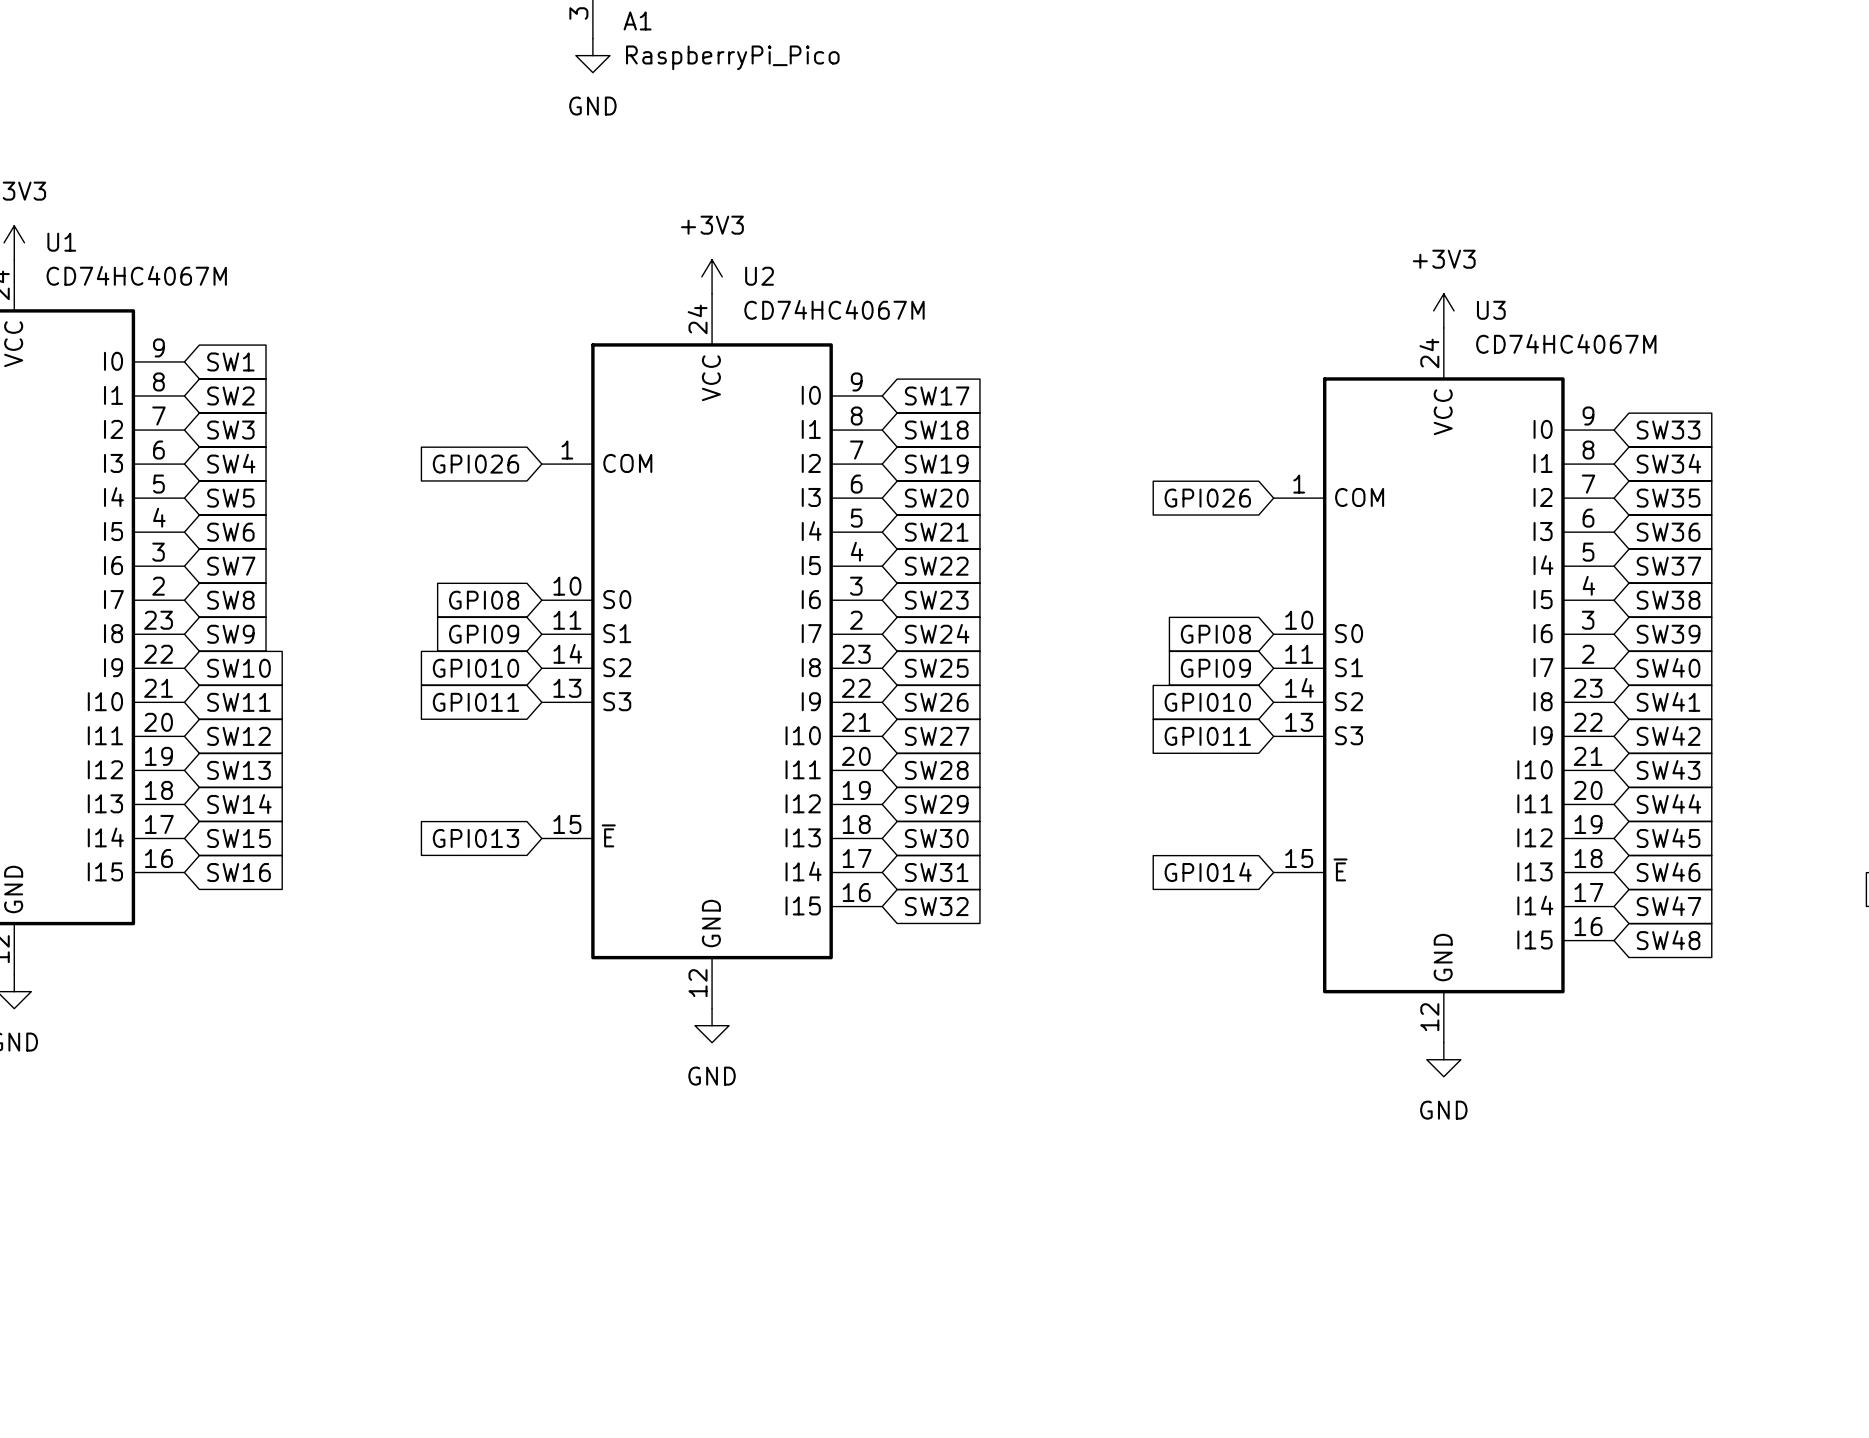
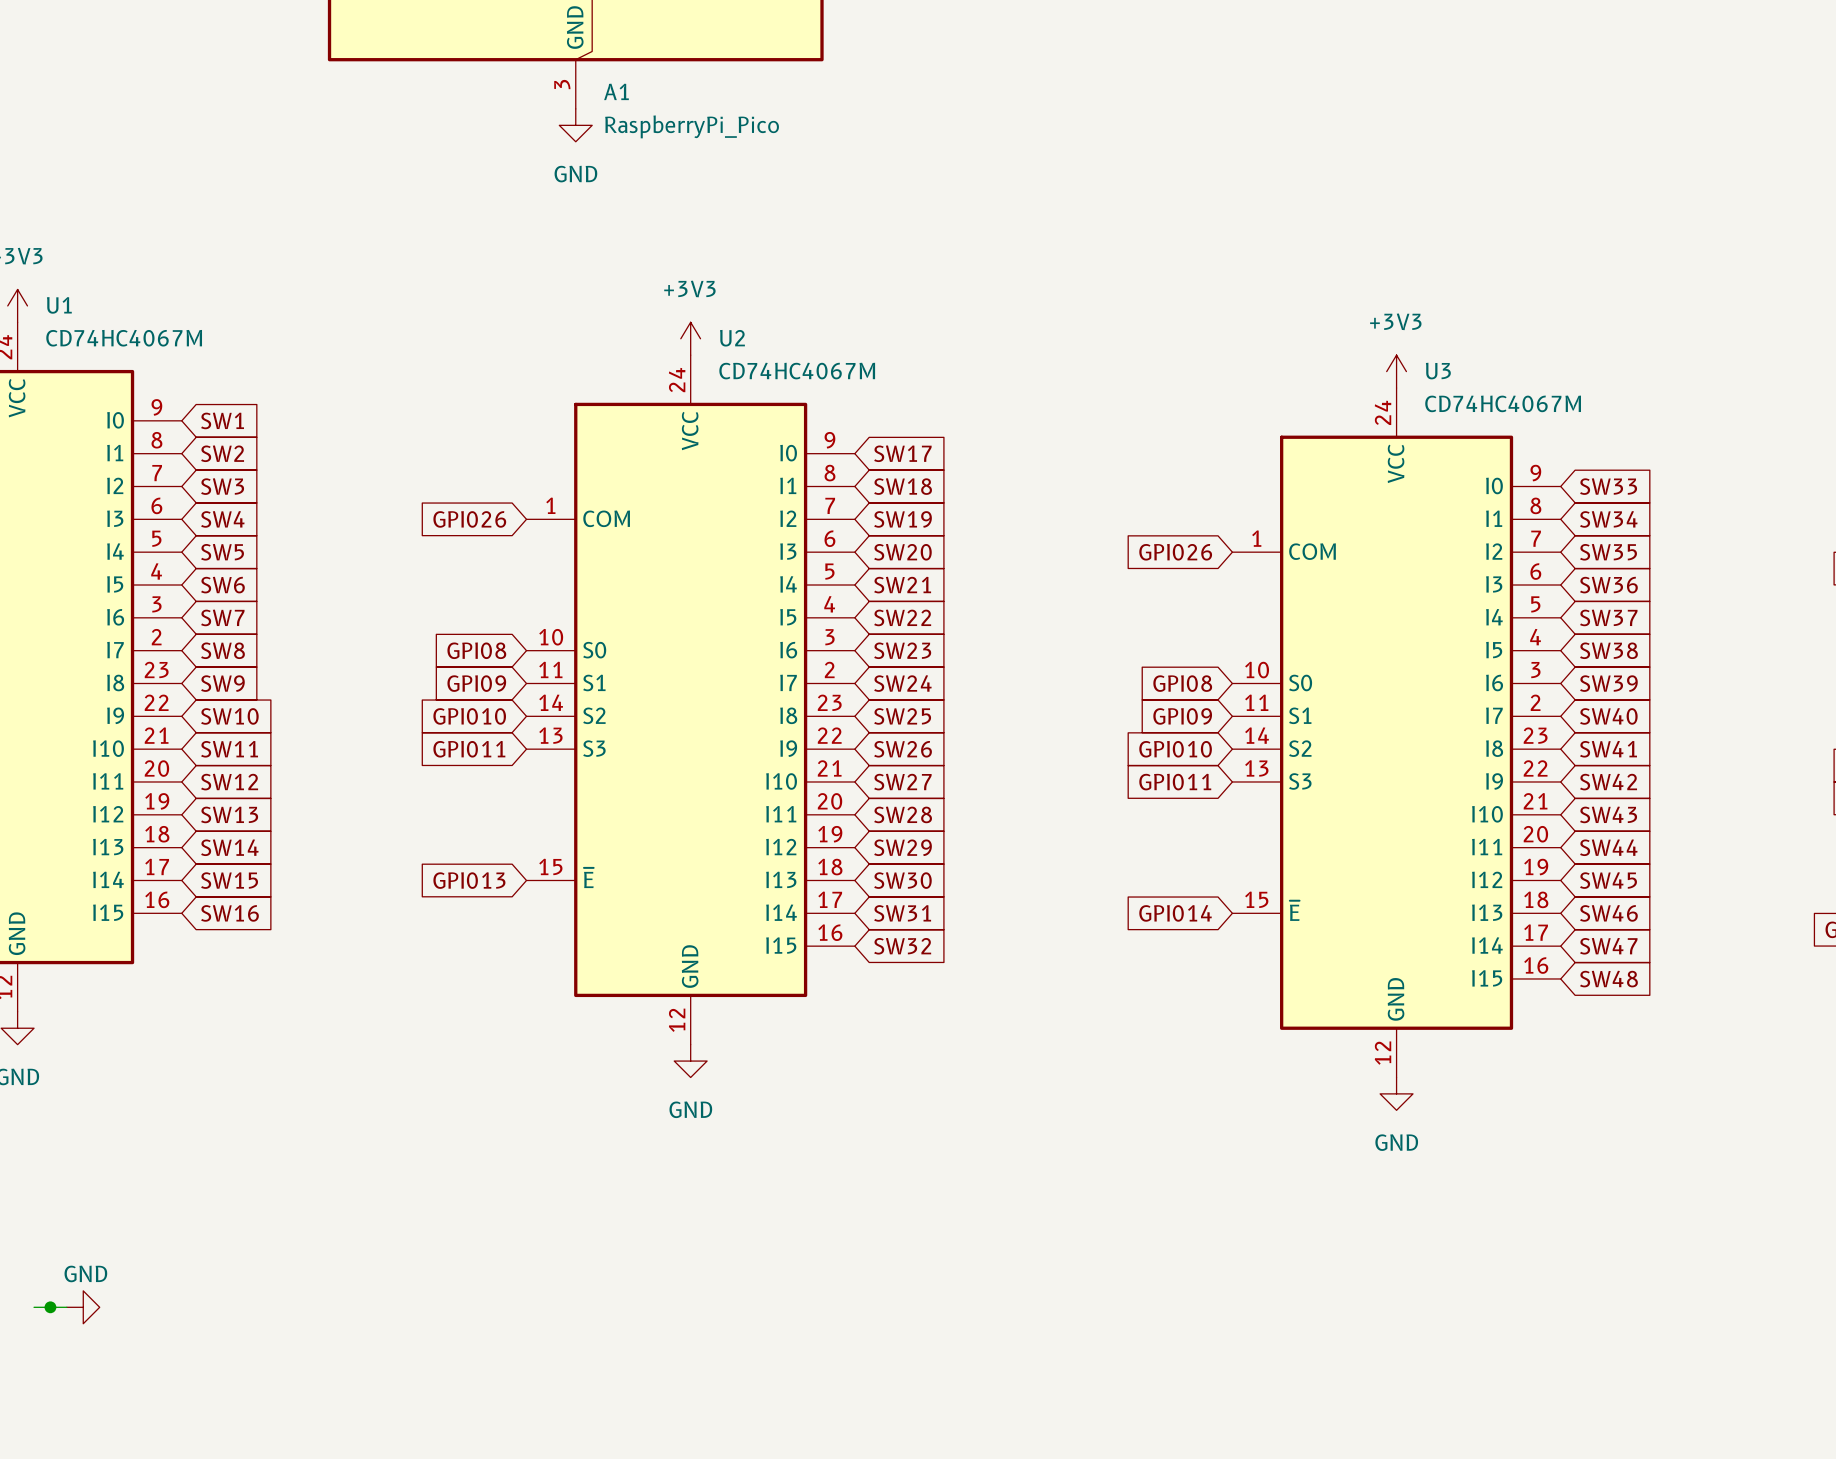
wire: none -> (34, 1307) (66, 1307)
junction: none -> (50, 1307)
power symbol: none -> GND (83, 1307)

